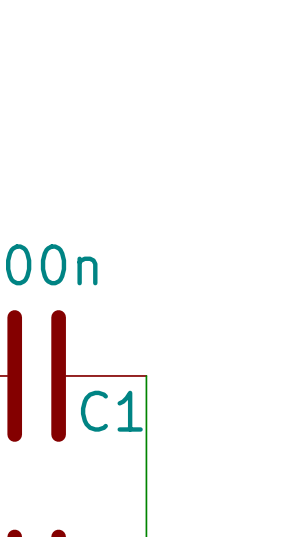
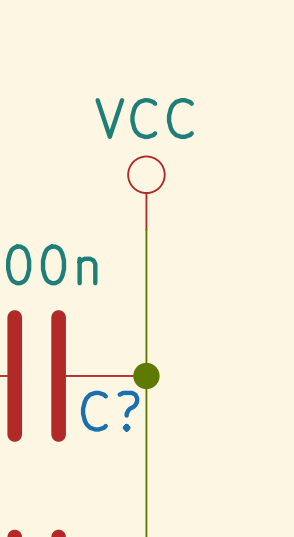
power symbol: none -> VCC (146, 193)
wire: none -> (146, 229) (146, 375)
junction: none -> (146, 375)
C1 name: C1 (111, 411) -> C? (110, 411)

